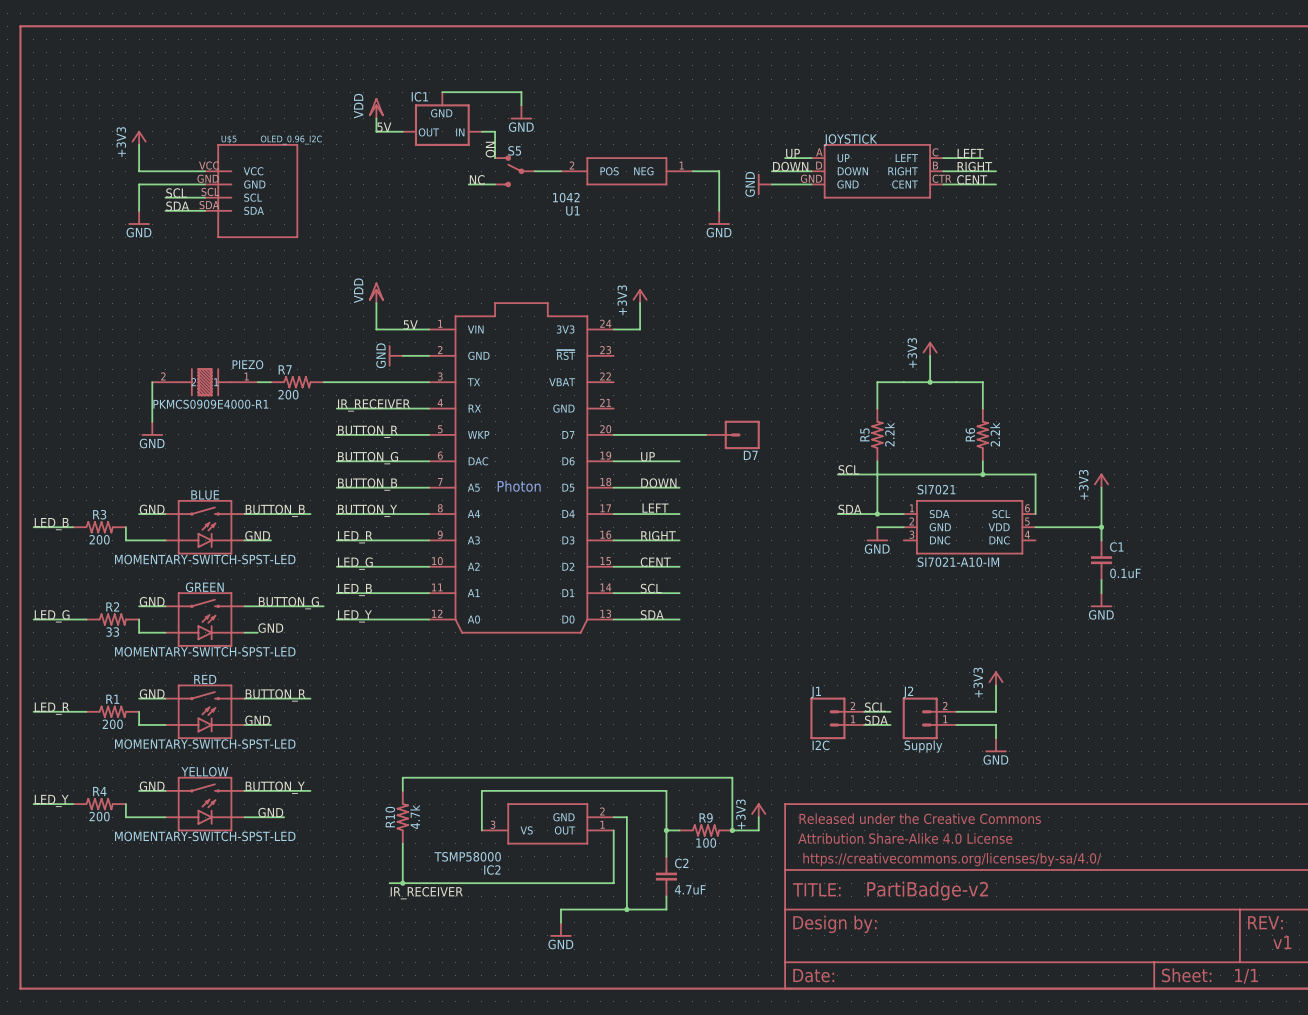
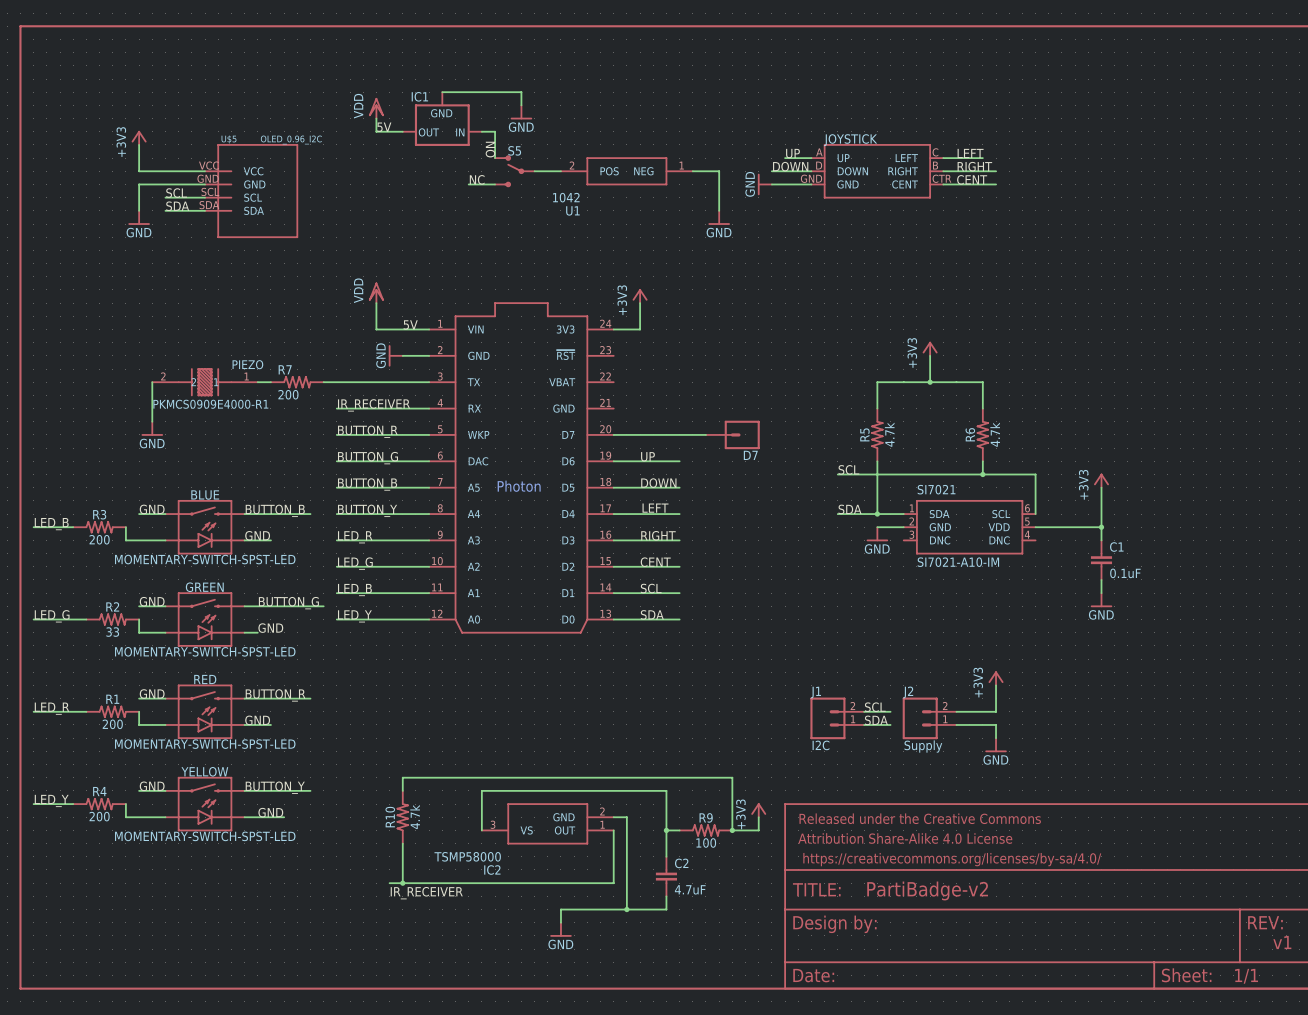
R5 value: 2.2k (889, 434) -> 4.7k (889, 434)
R6 value: 2.2k (995, 434) -> 4.7k (995, 434)

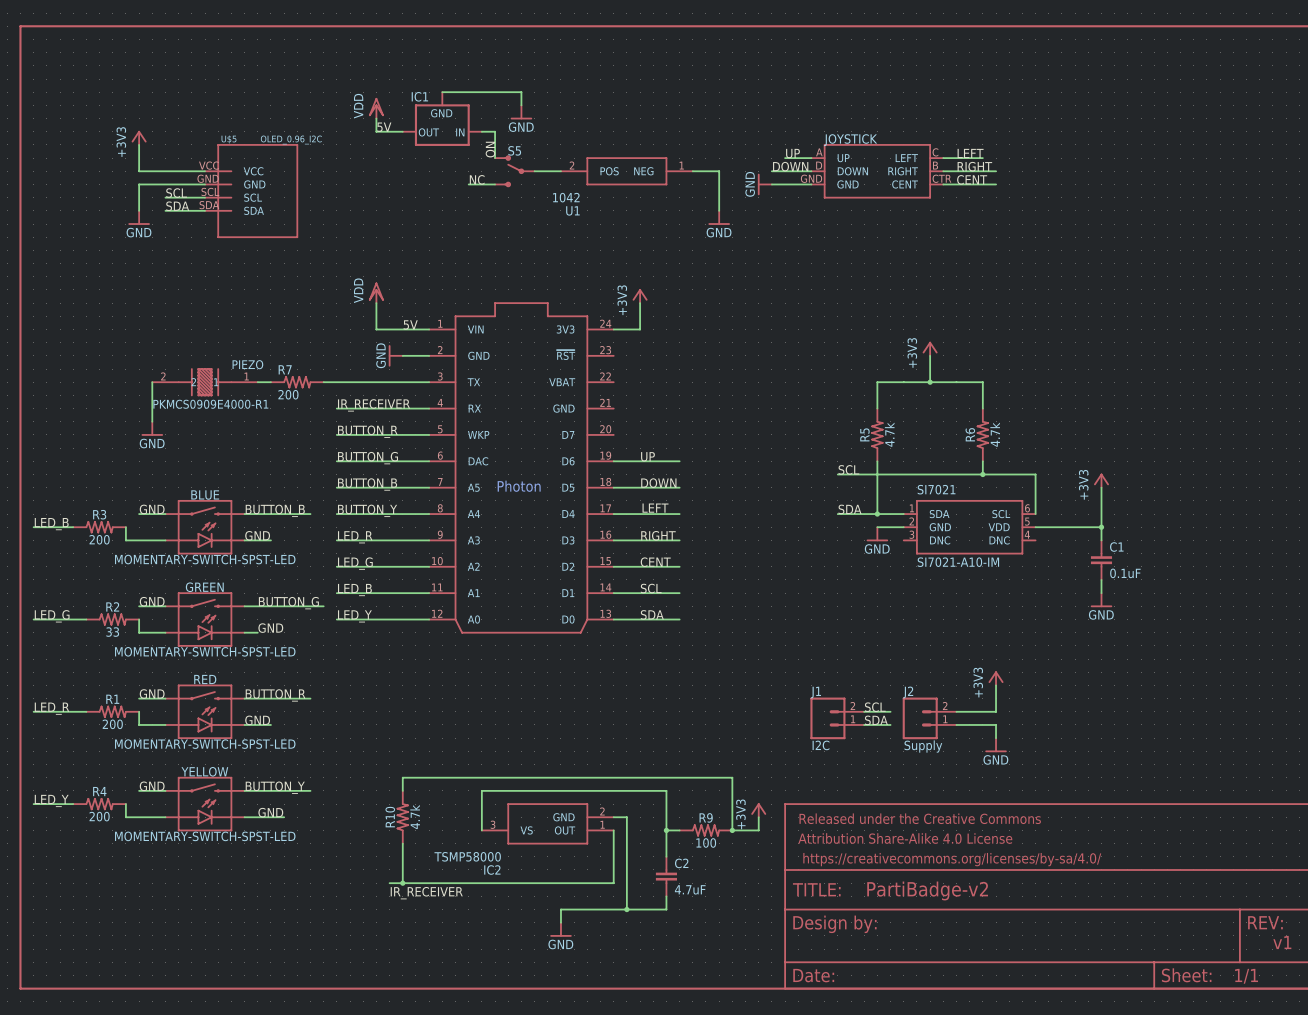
wire: (613, 434) (705, 434) -> none
D7: (732, 434) -> none

